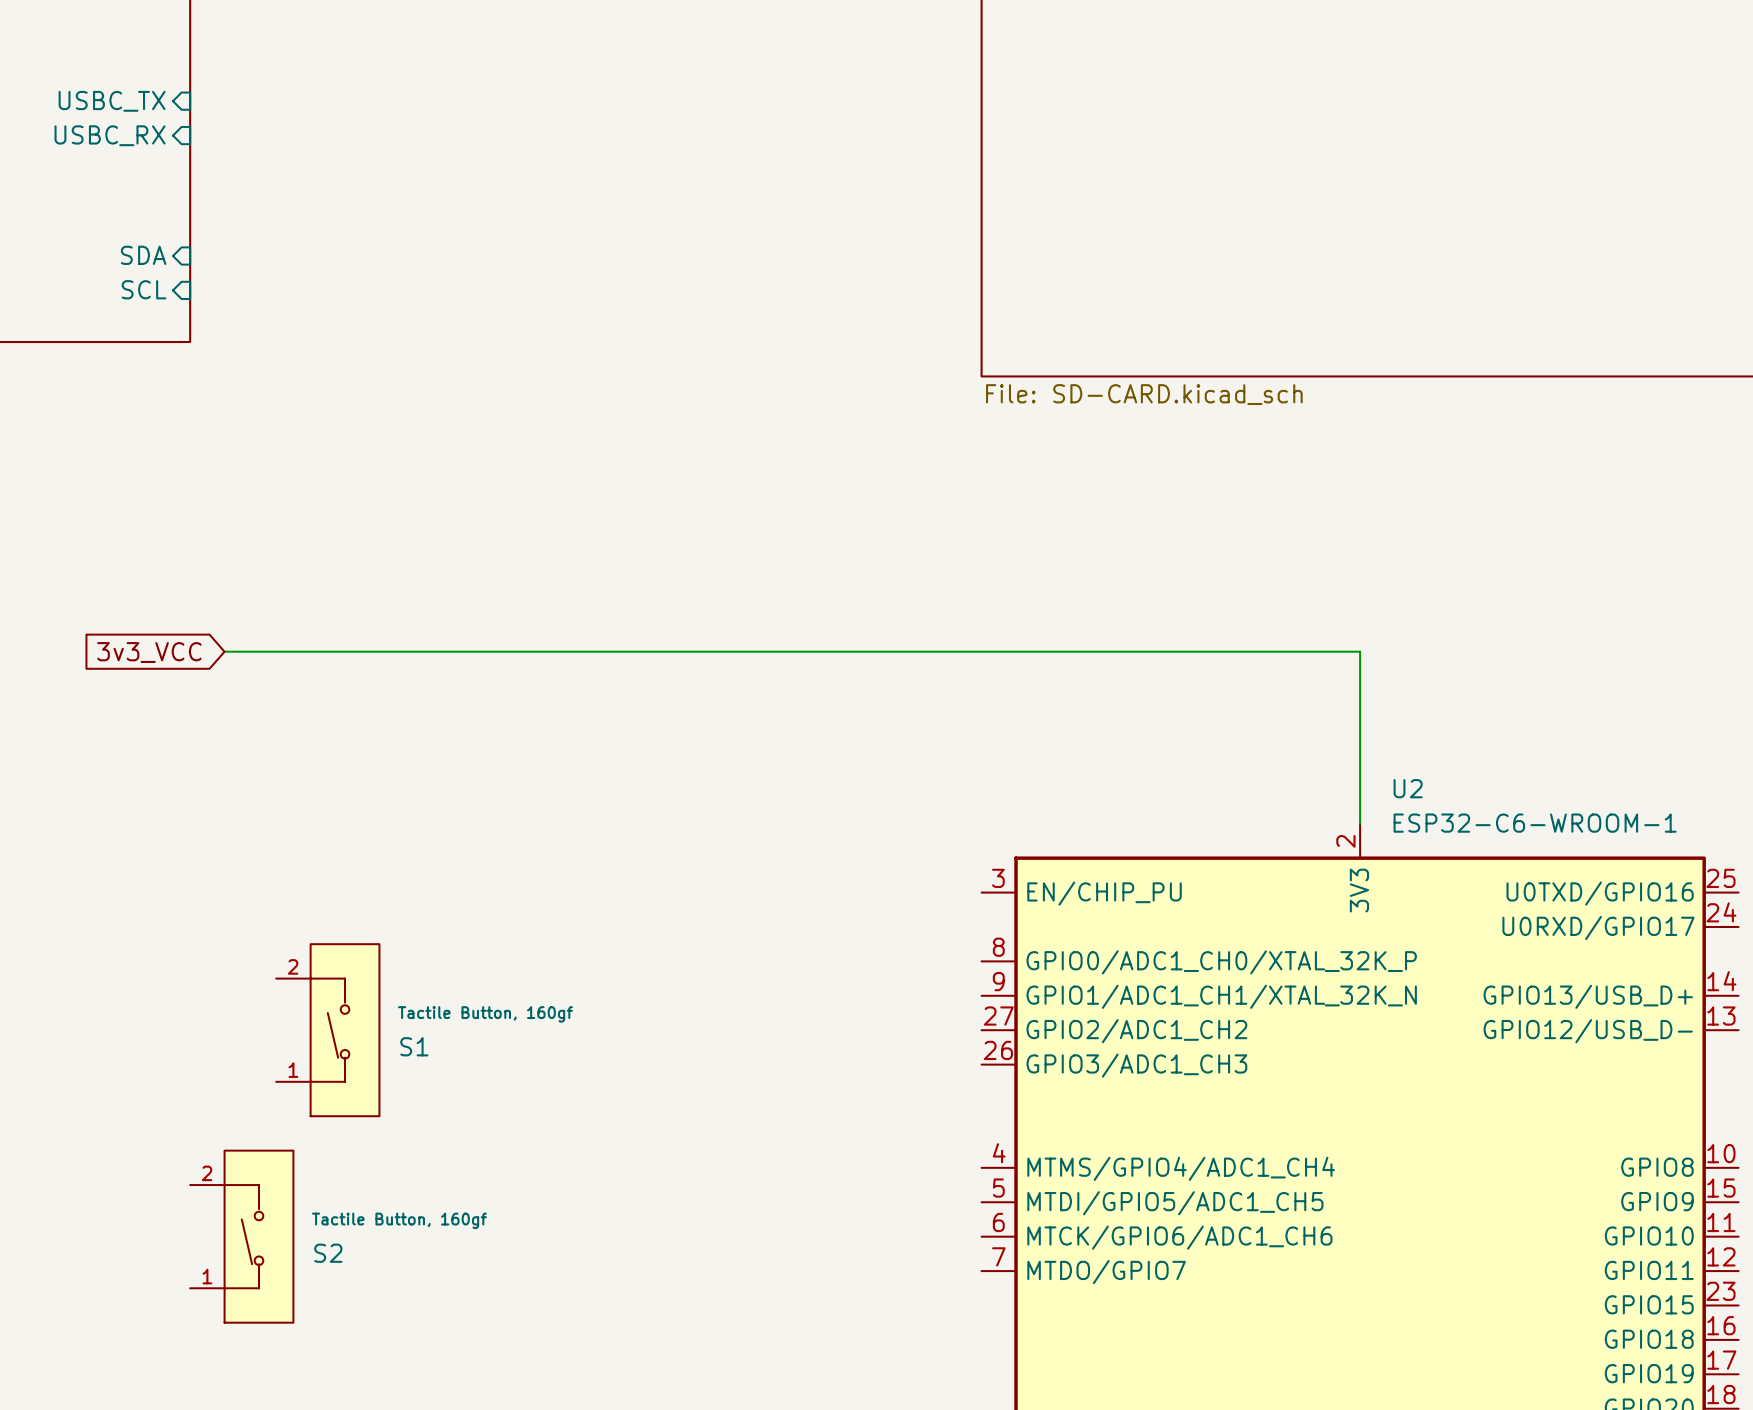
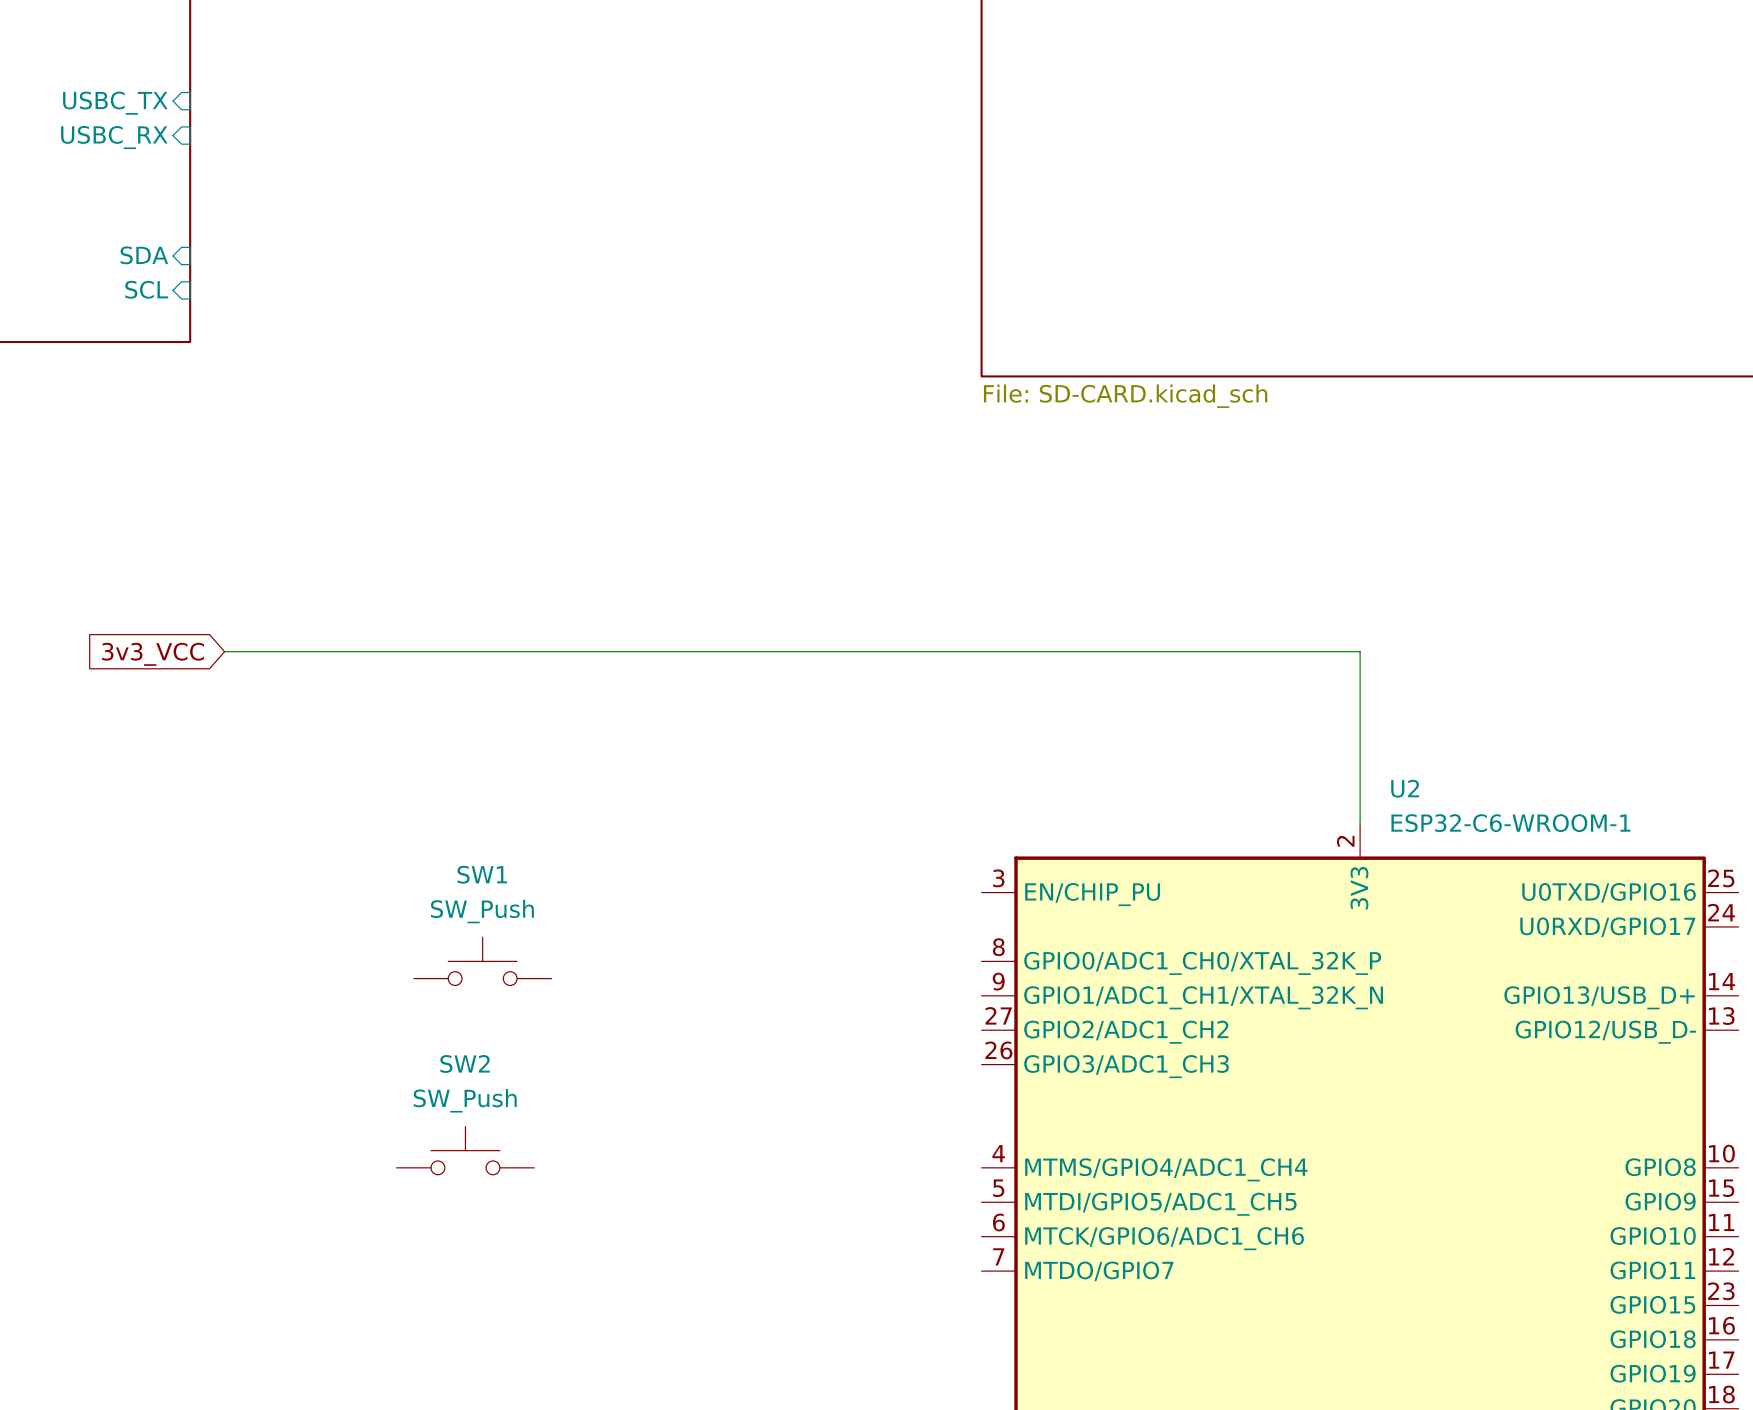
SW1: none -> SW_Push (482, 961)
S1: Tactile Button, 160gf (327, 1030) -> none
SW2: none -> SW_Push (465, 1150)
S2: Tactile Button, 160gf (241, 1236) -> none

